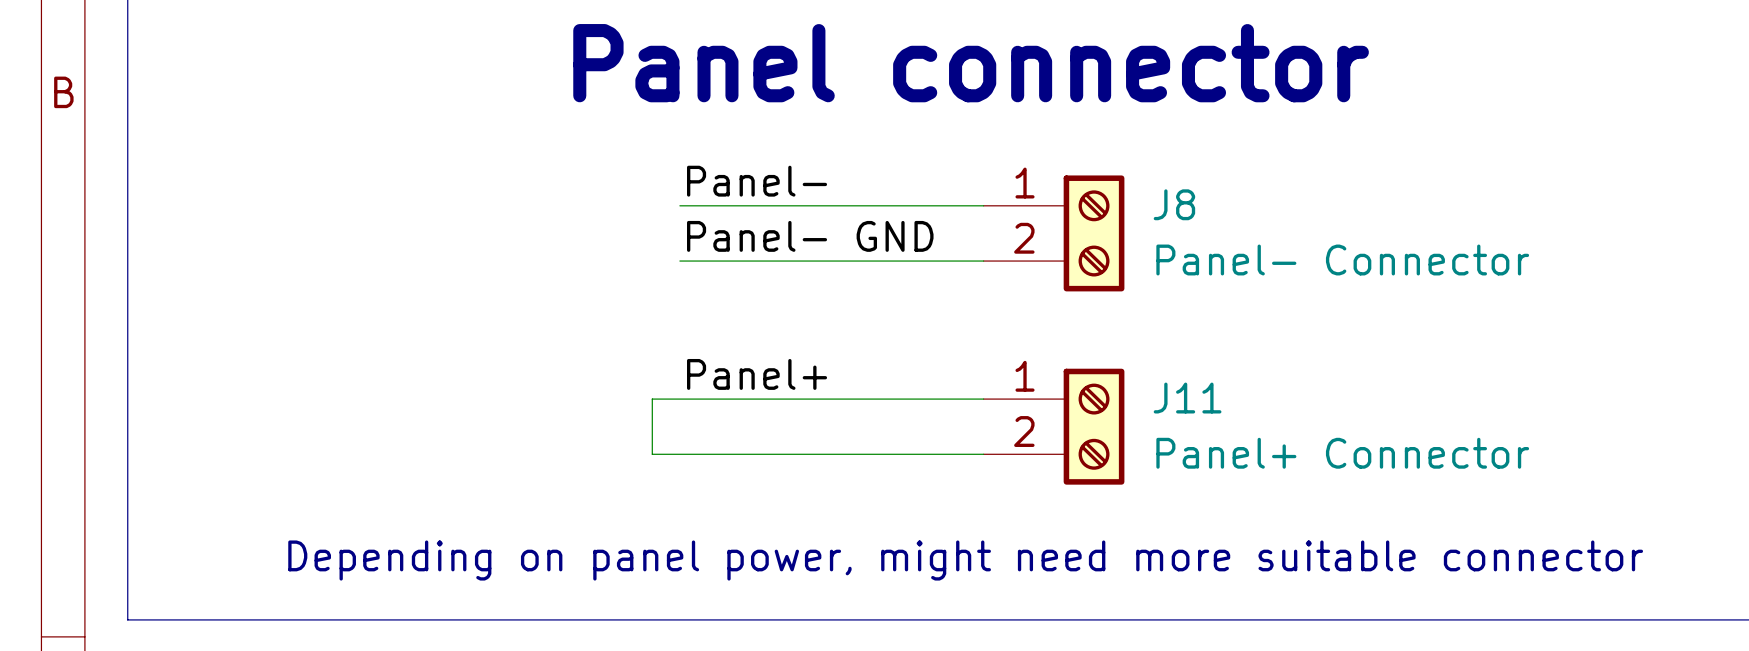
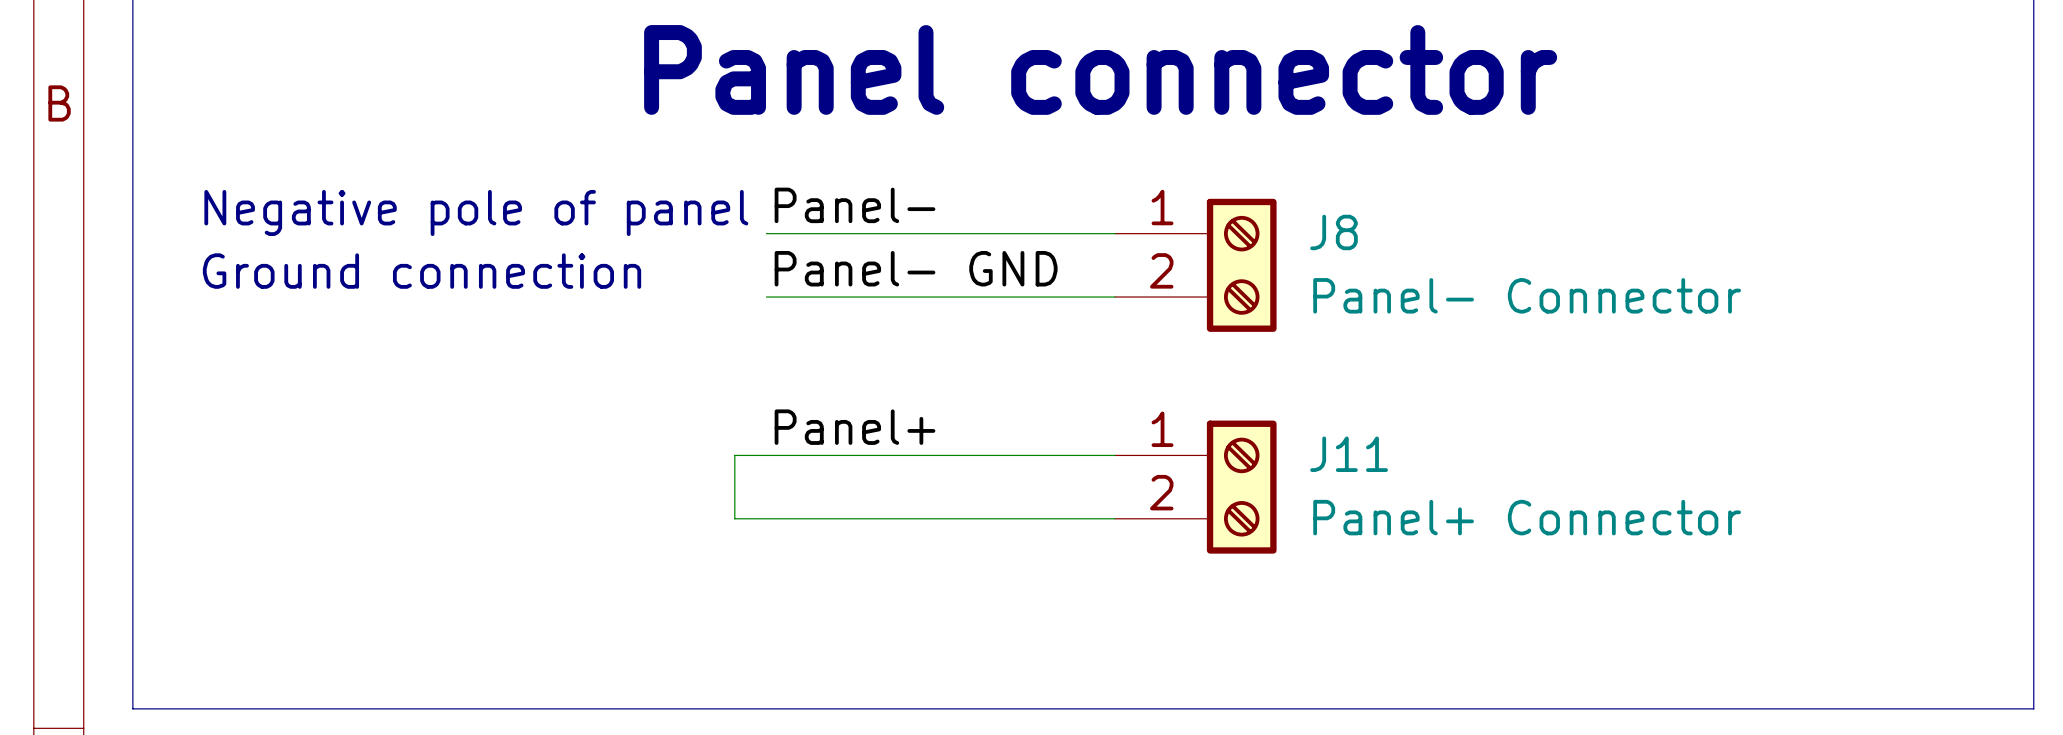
text: none -> Negative pole of panel (476, 212)
text: none -> Ground connection (422, 271)
text: Depending on panel power, might need more suitable connector (965, 560) -> none

